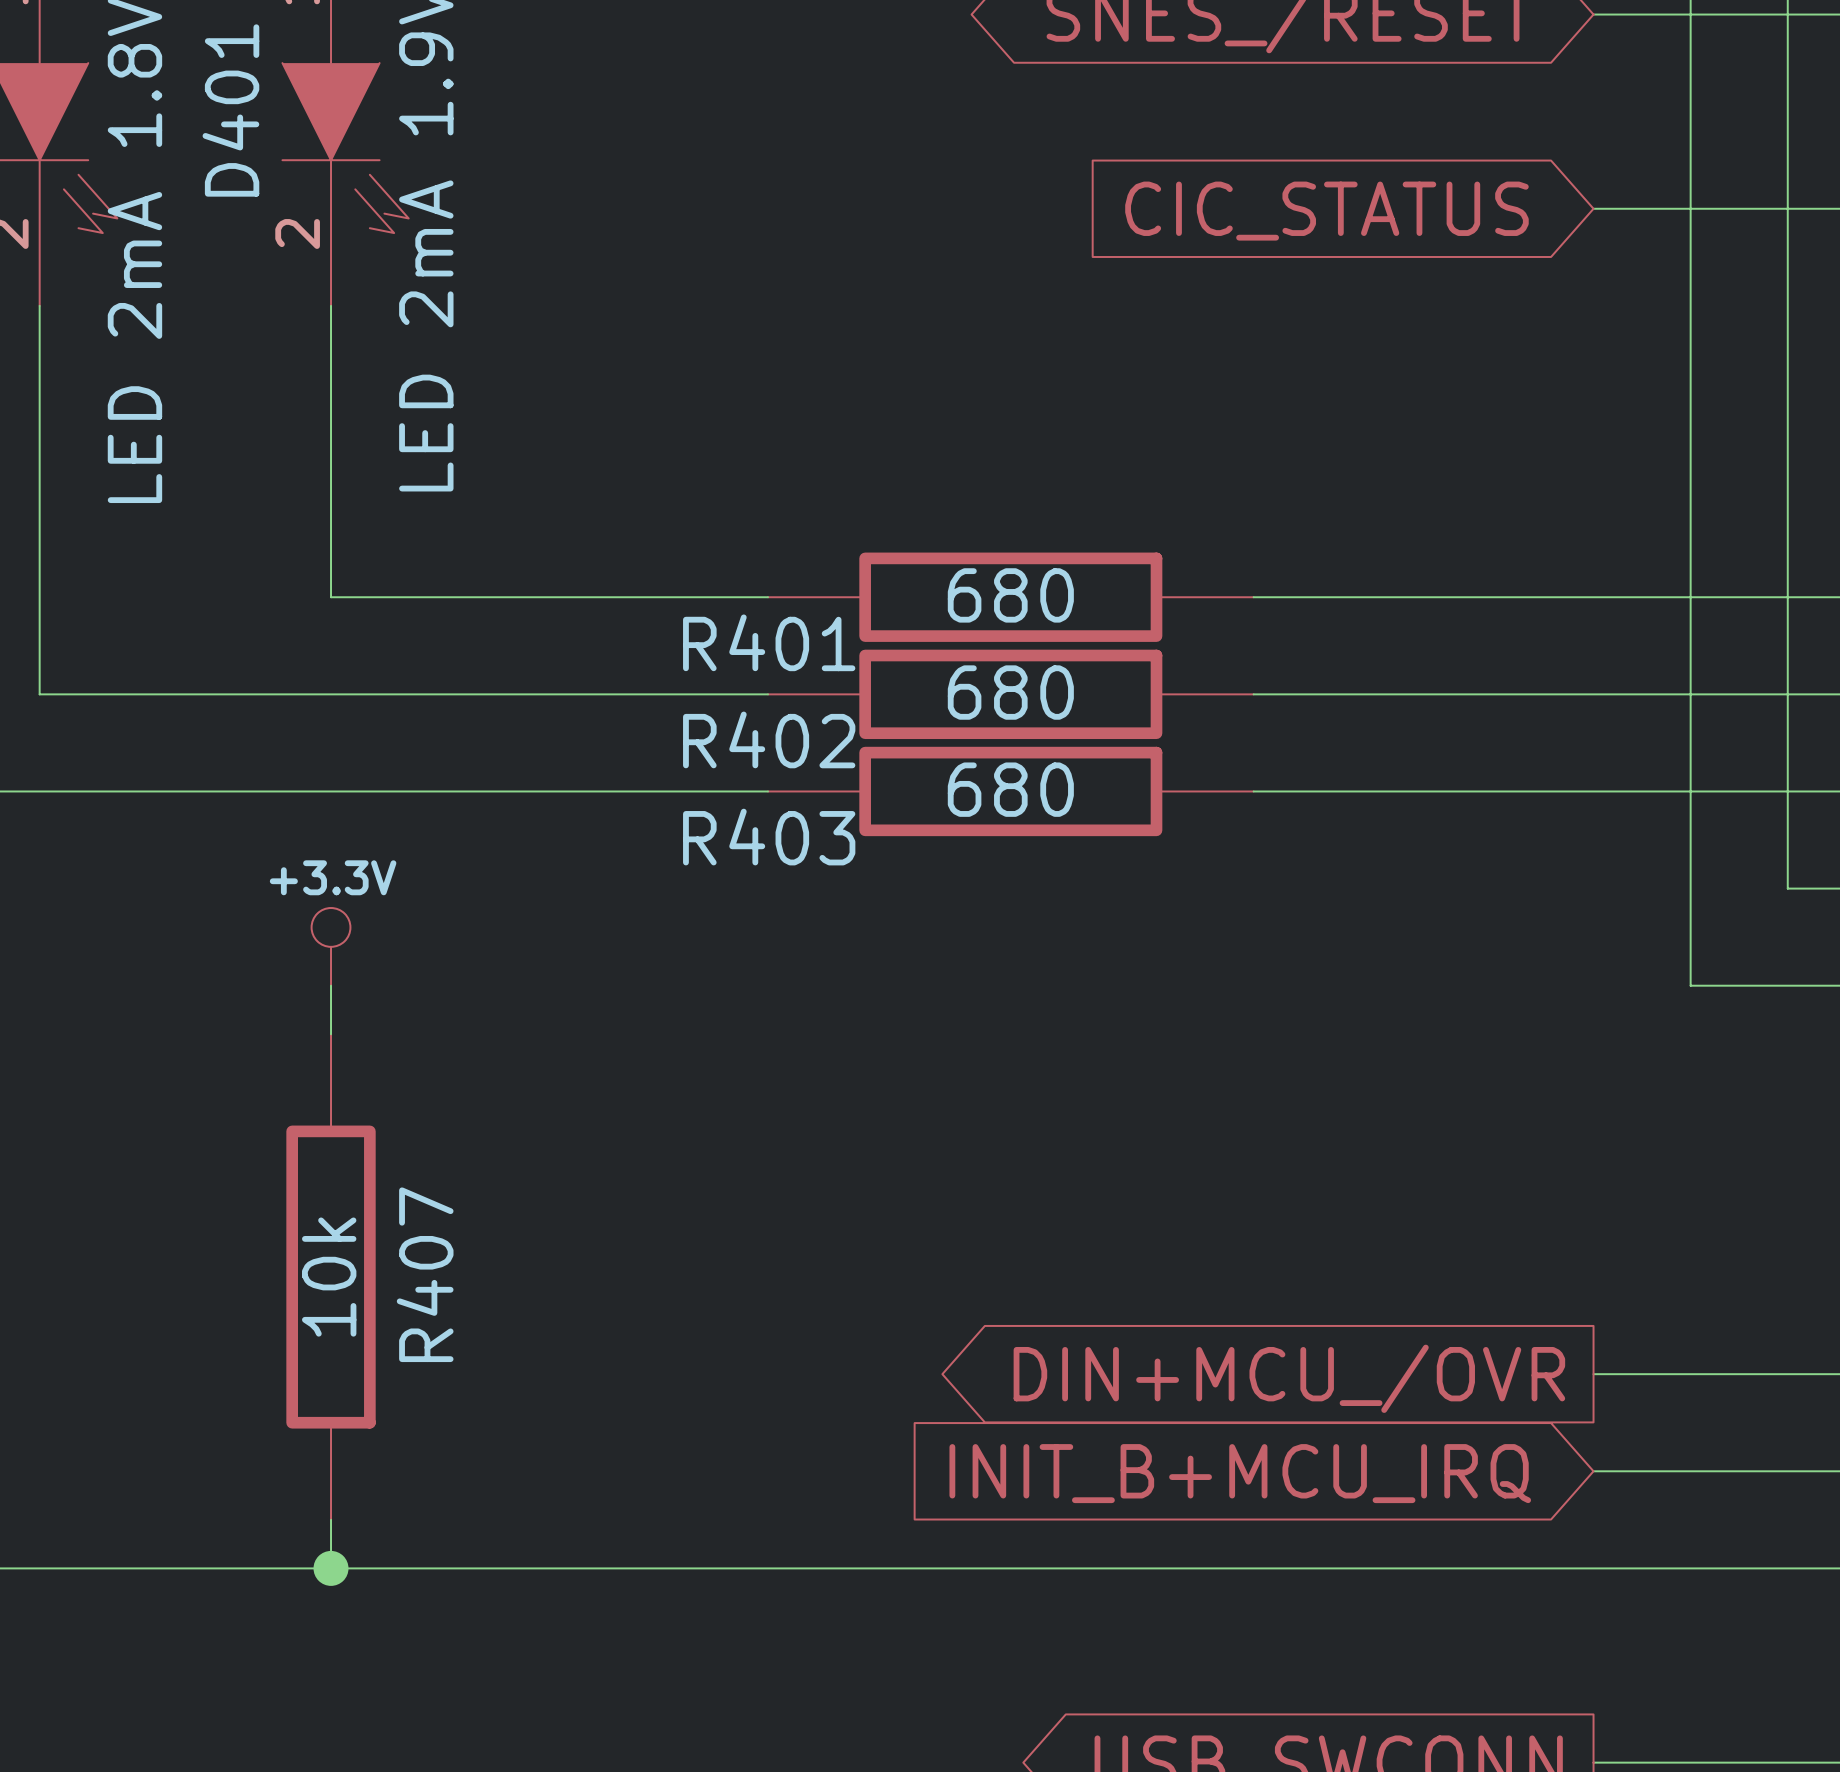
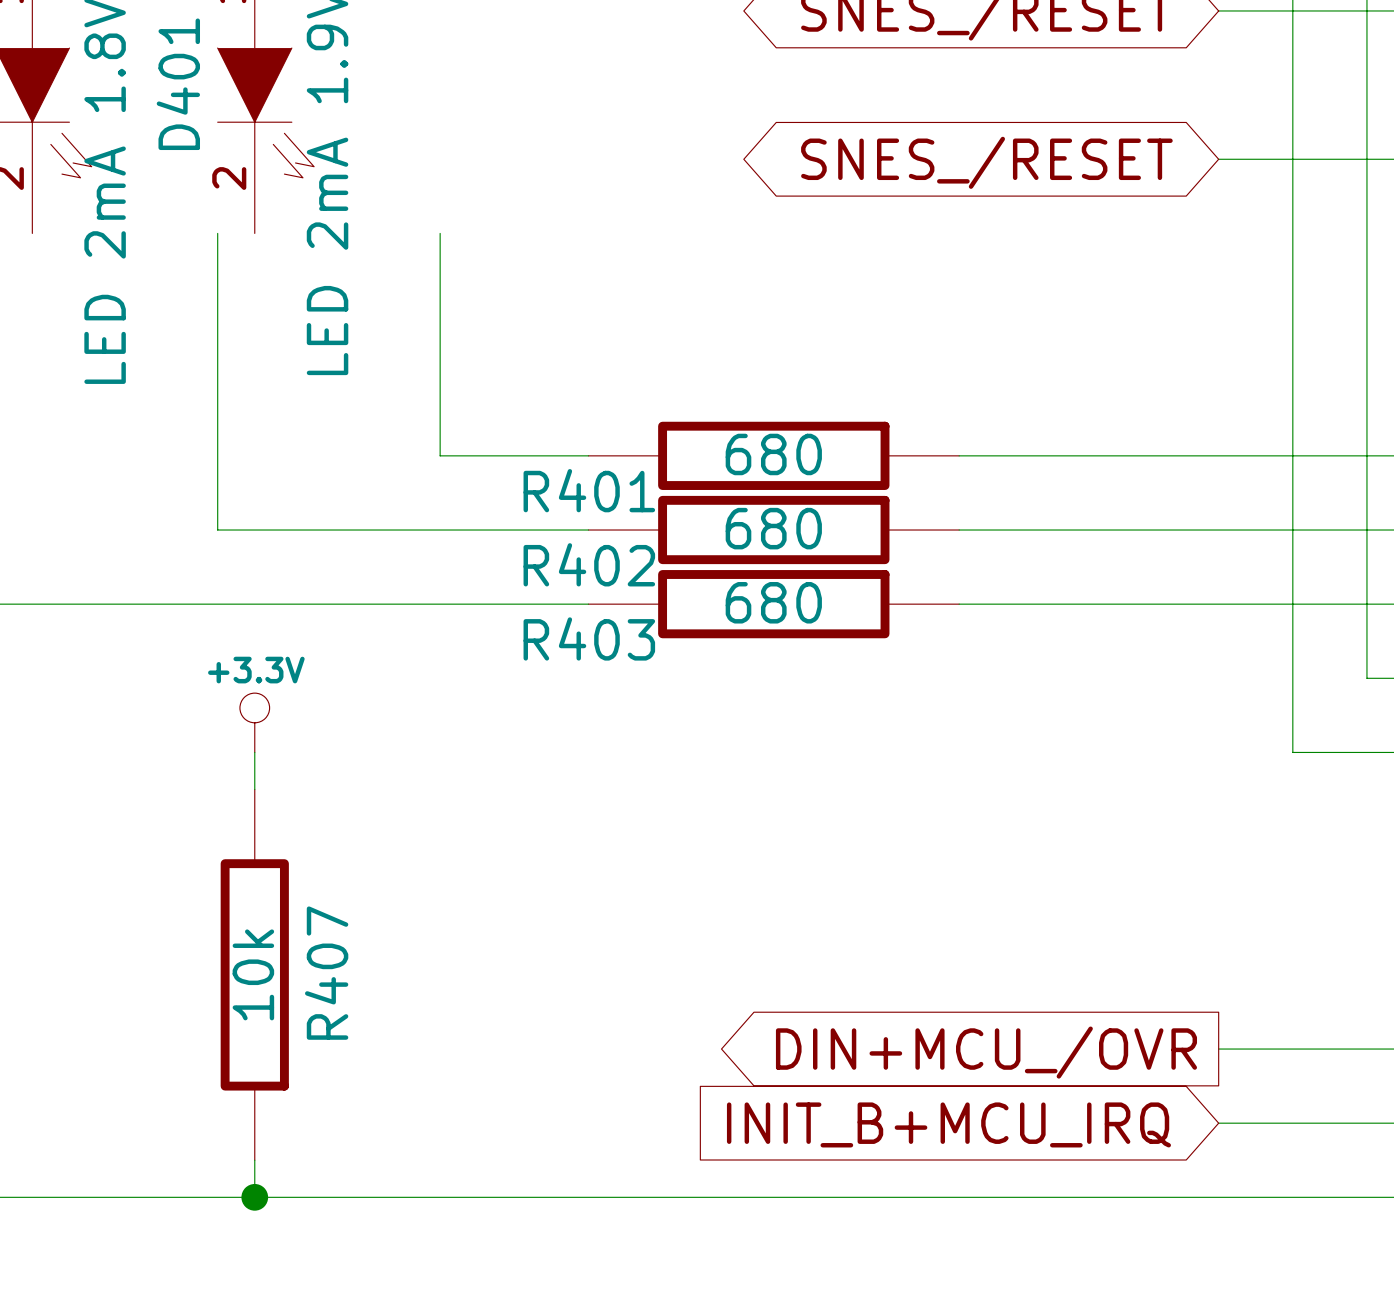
global label shape: input (1326, 211) -> bidirectional (986, 162)
global label: CIC_STATUS (1326, 211) -> SNES_/RESET (986, 162)
wire: (39, 305) (39, 694) (282, 694) -> (217, 233) (217, 530)
wire: (331, 305) (331, 597) (573, 597) -> (440, 233) (440, 455)

